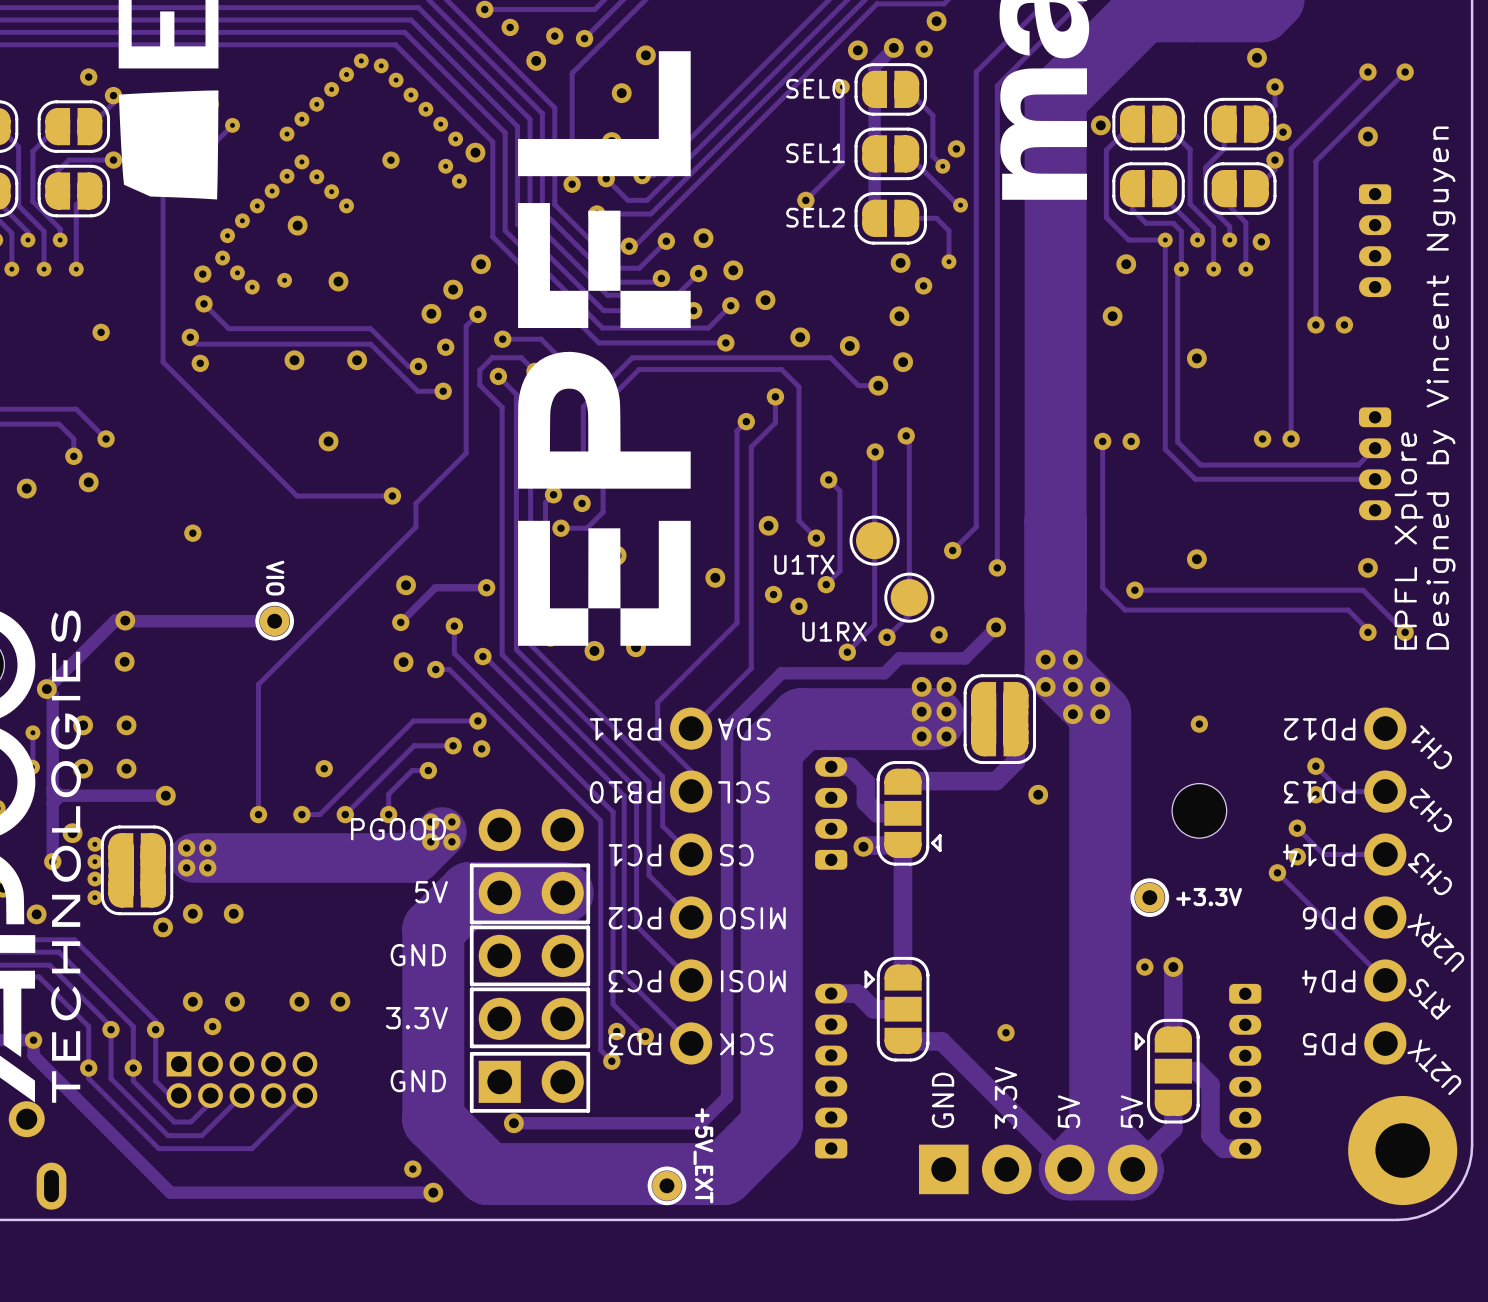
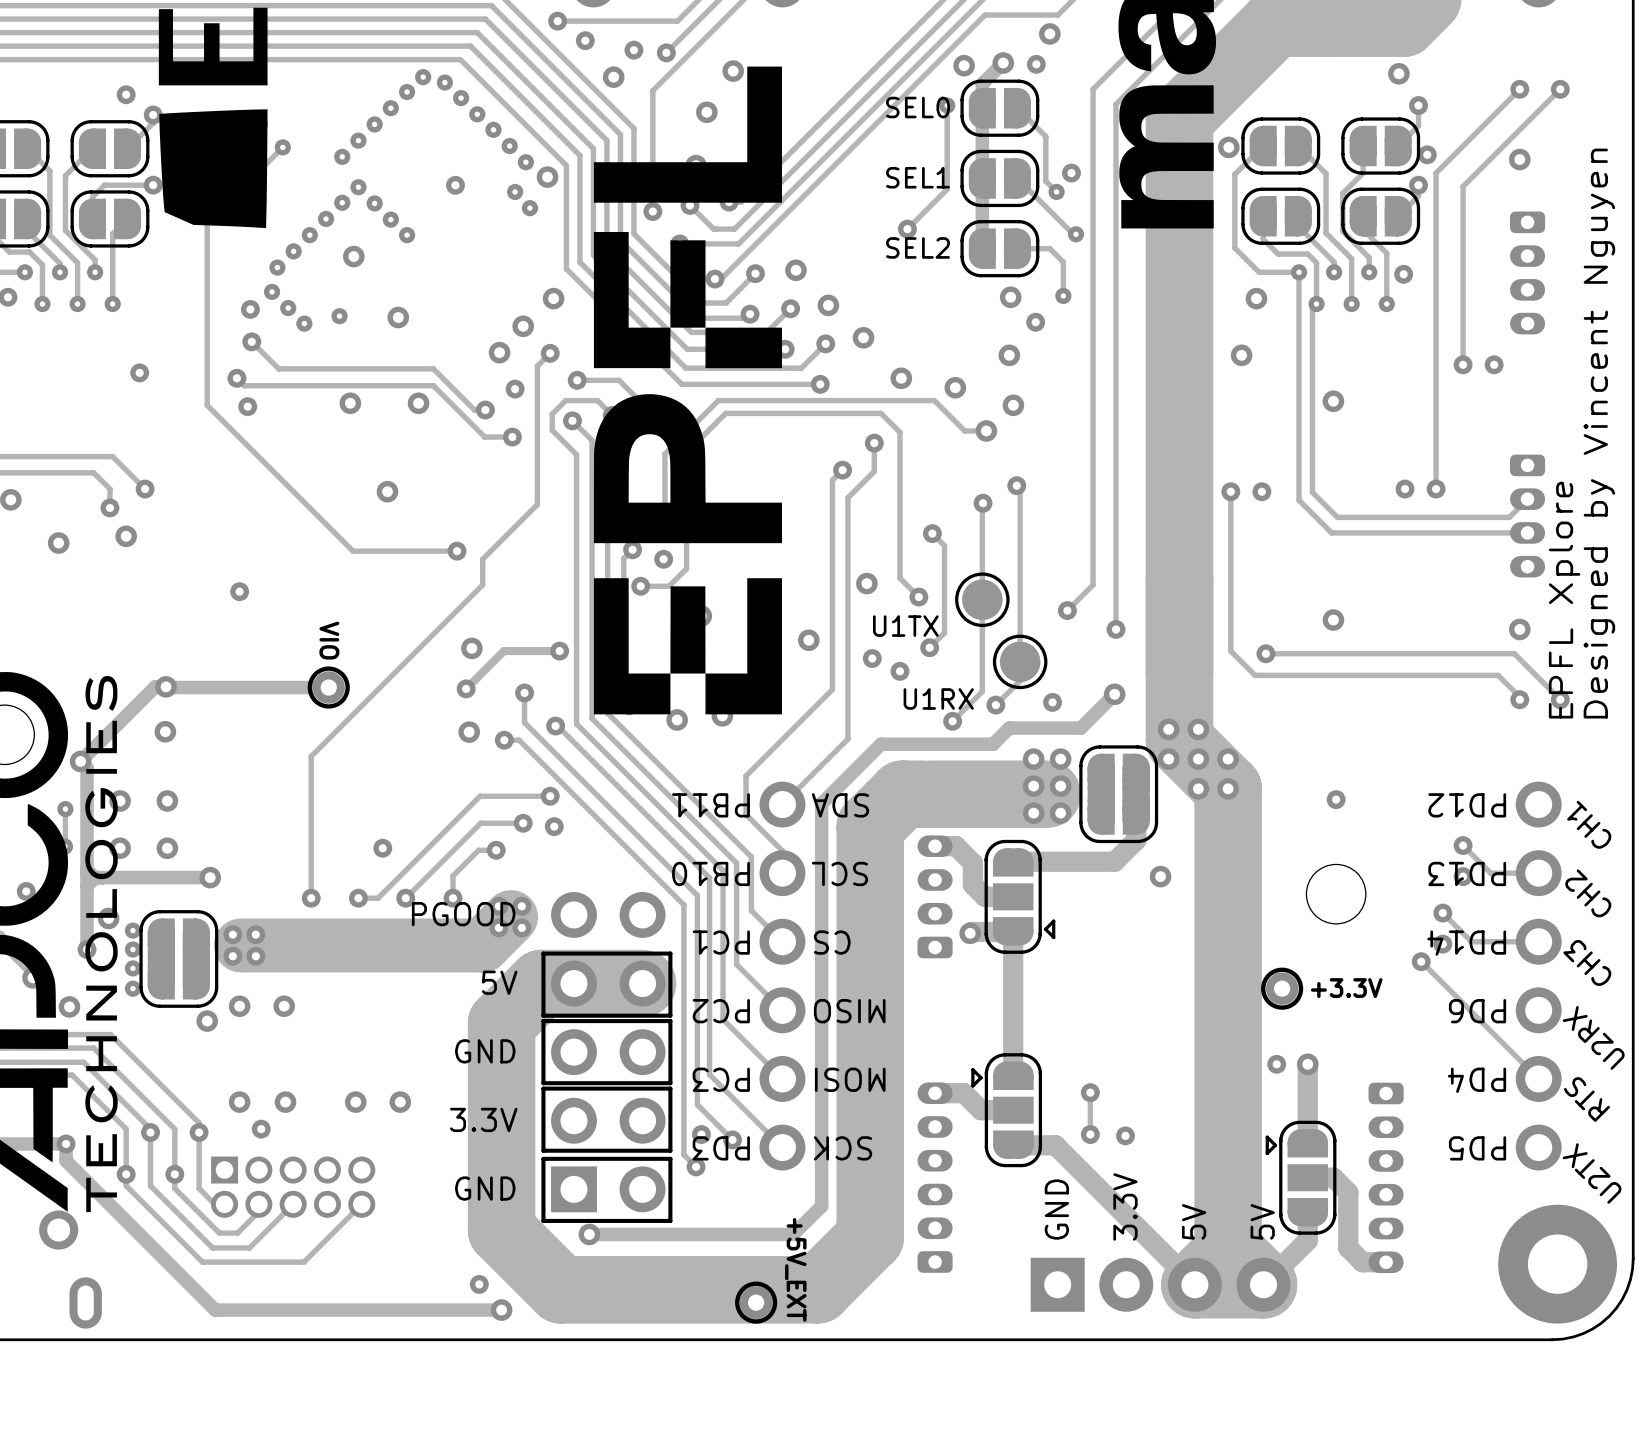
track: none -> (1090, 1092) (1090, 1134)
via: none -> (1090, 1092)
via: none -> (1090, 1134)

